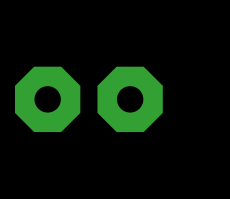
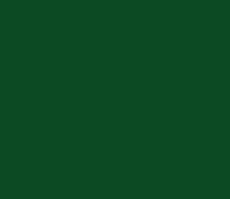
part: (88, 99) -> none

